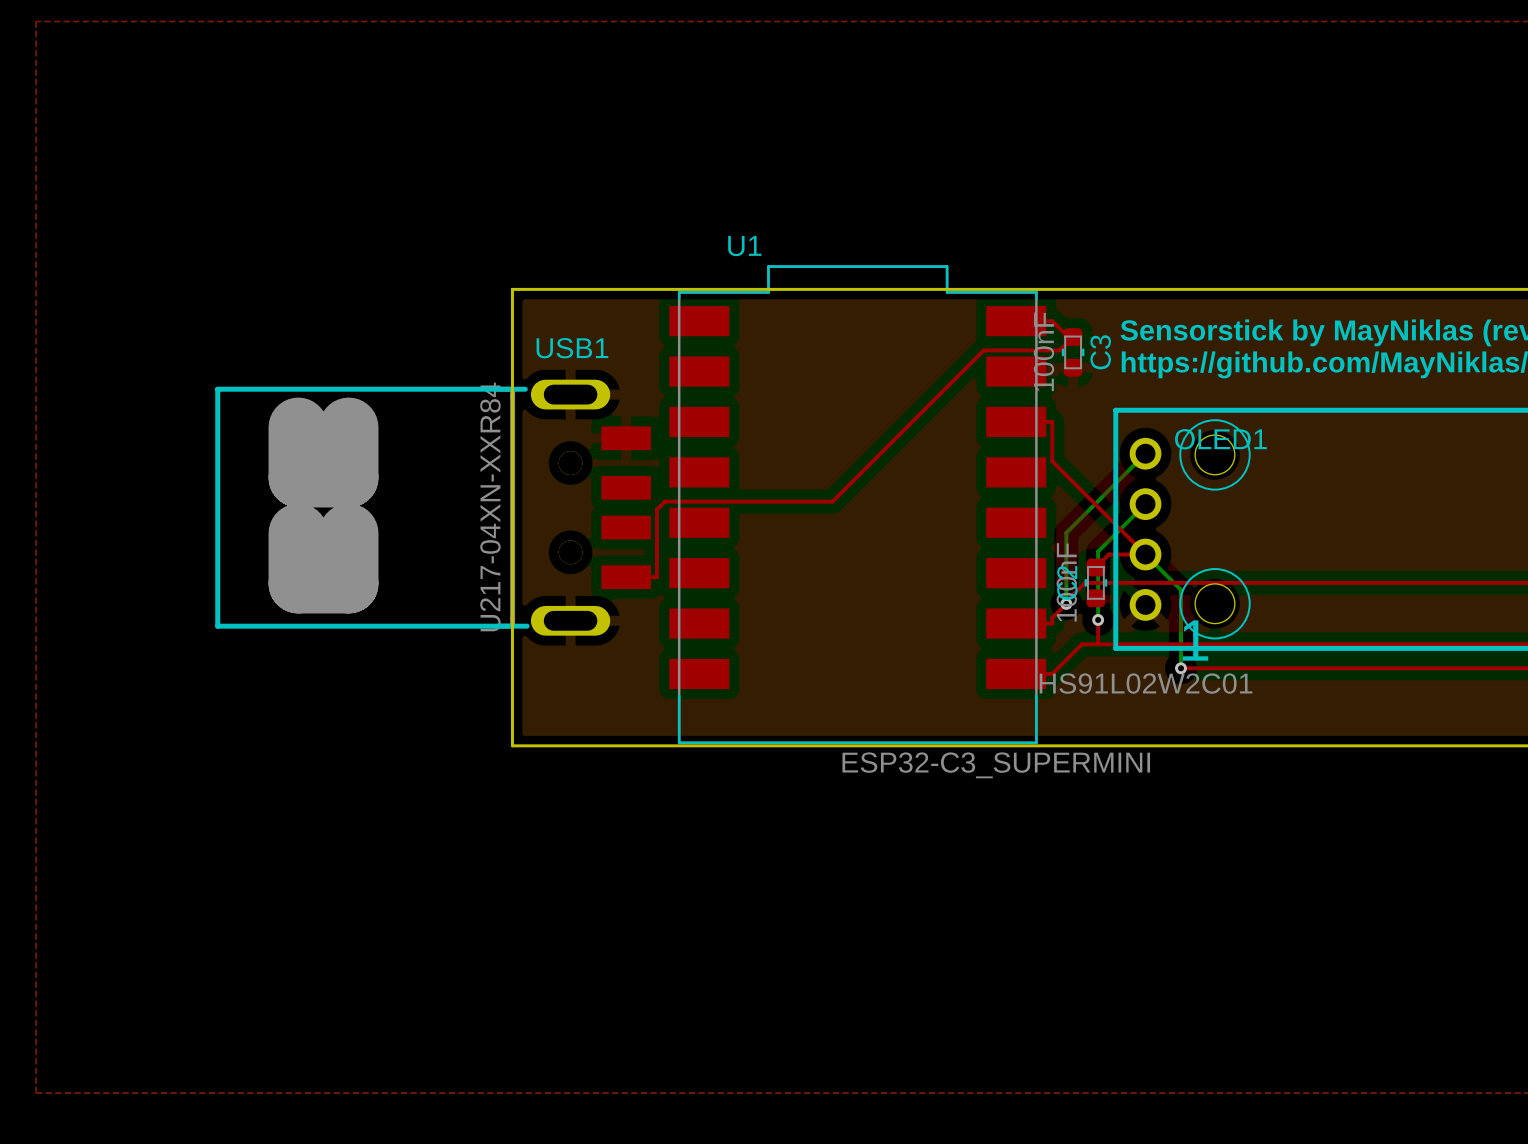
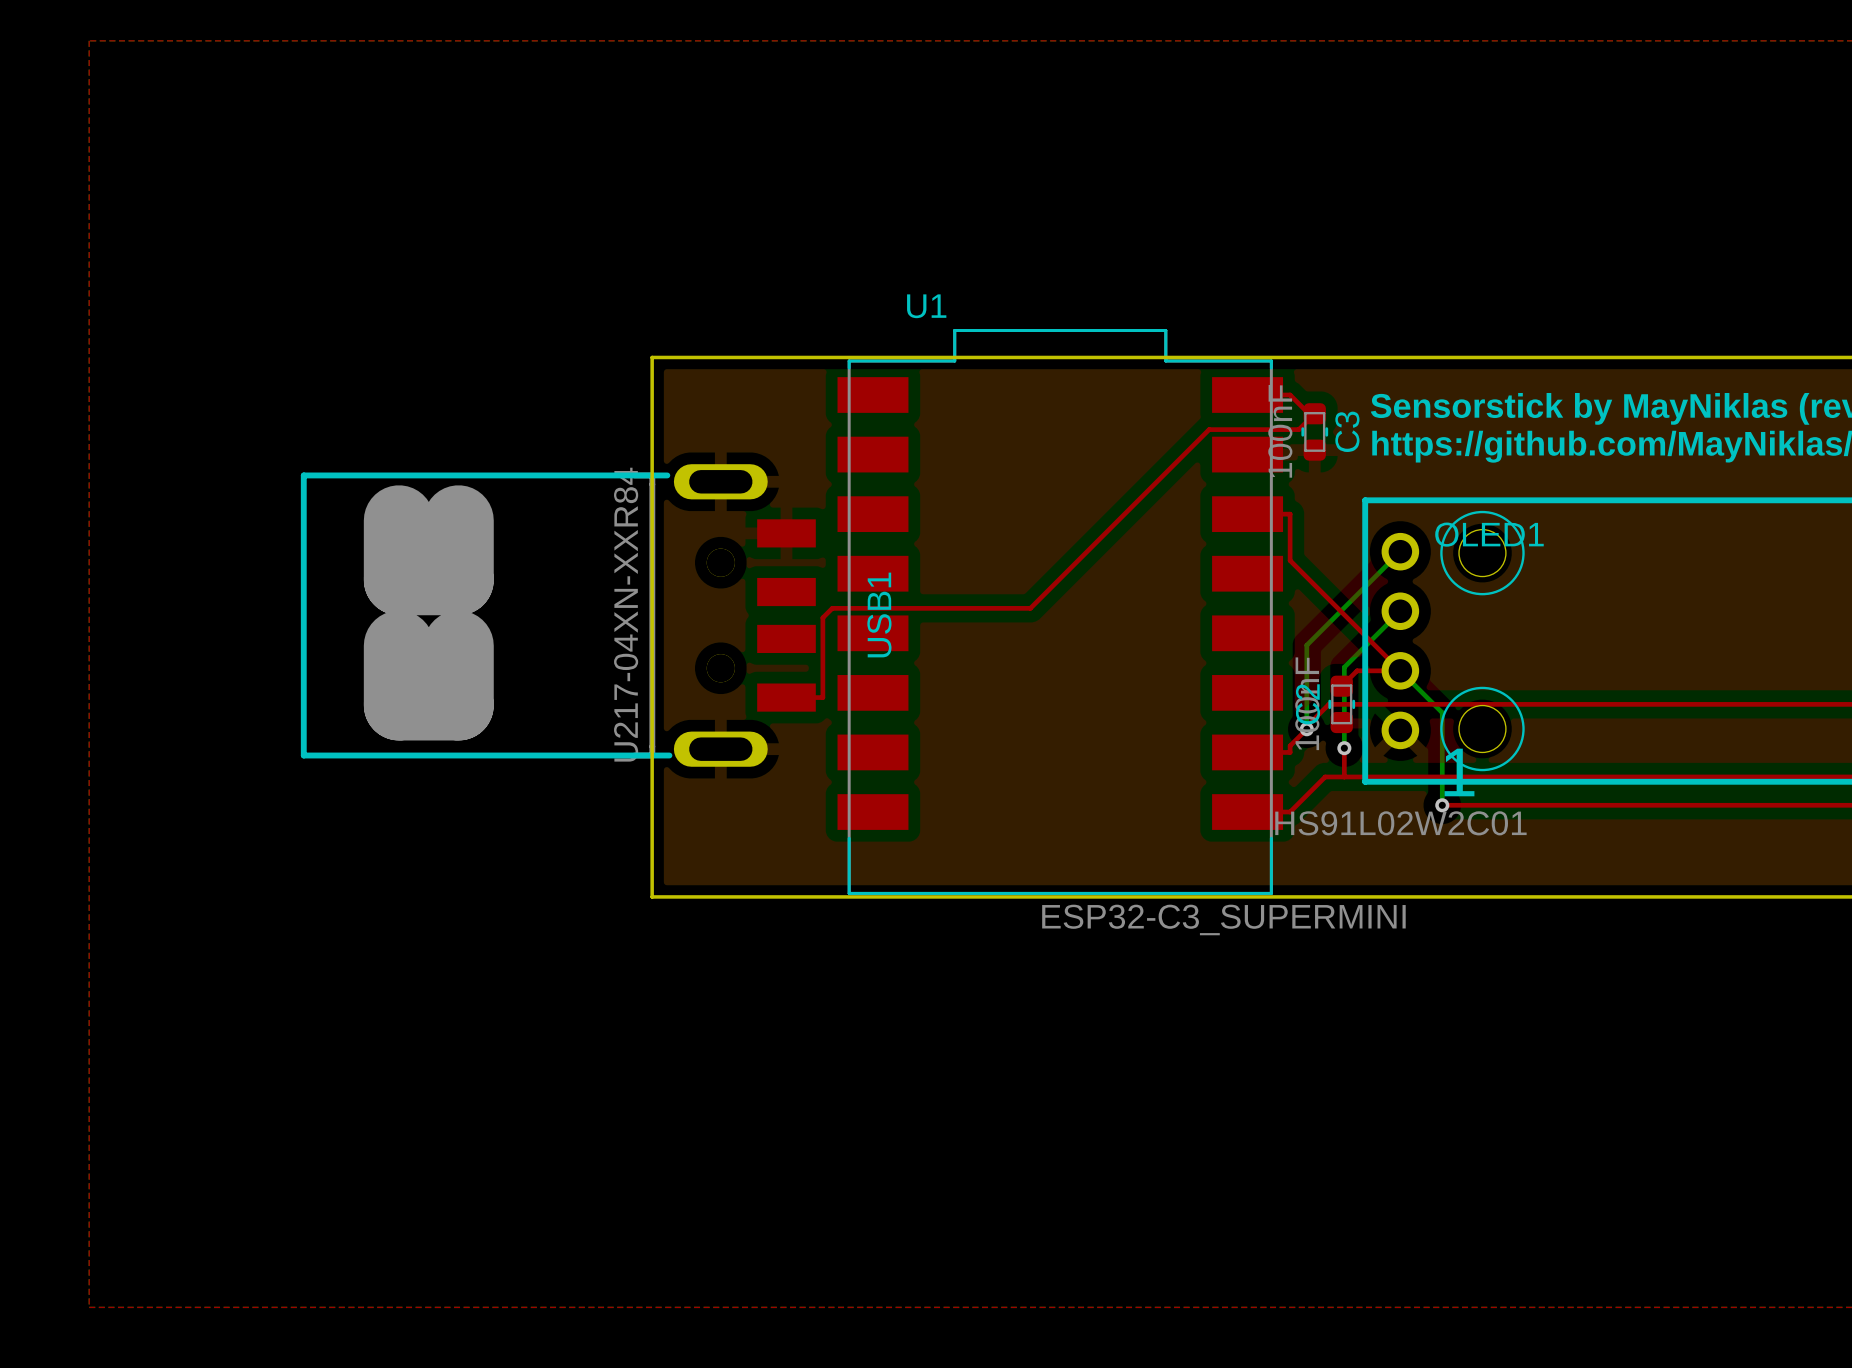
USB1 name rotation: 0° (572, 348) -> 90° counterclockwise (879, 614)
USB1 name position: USB1 (572, 348) -> USB1 (879, 614)

